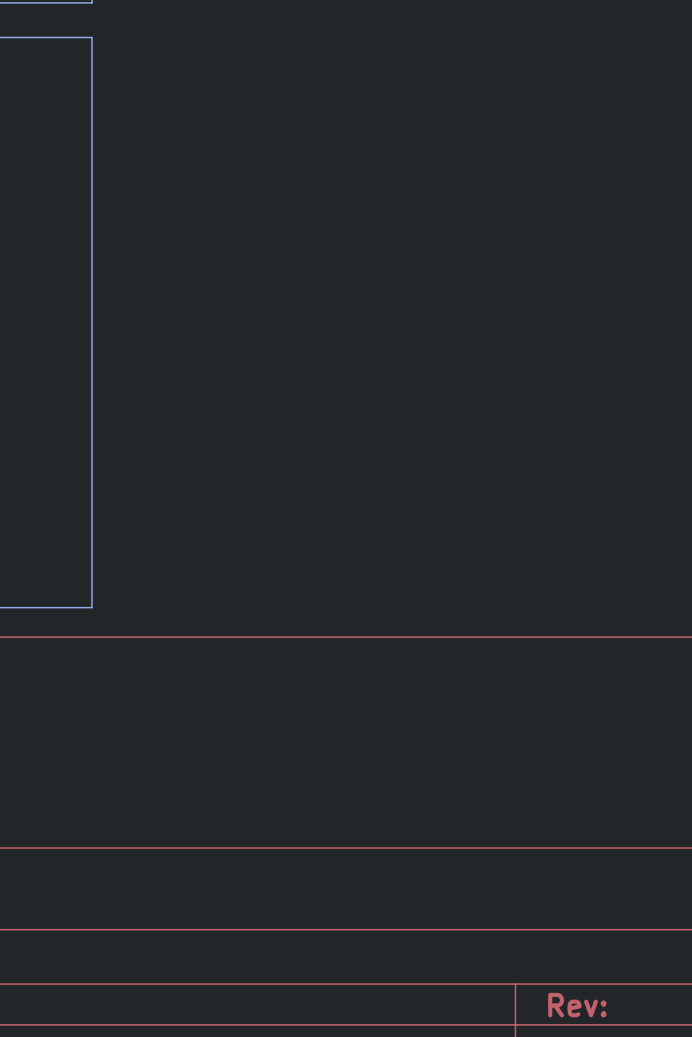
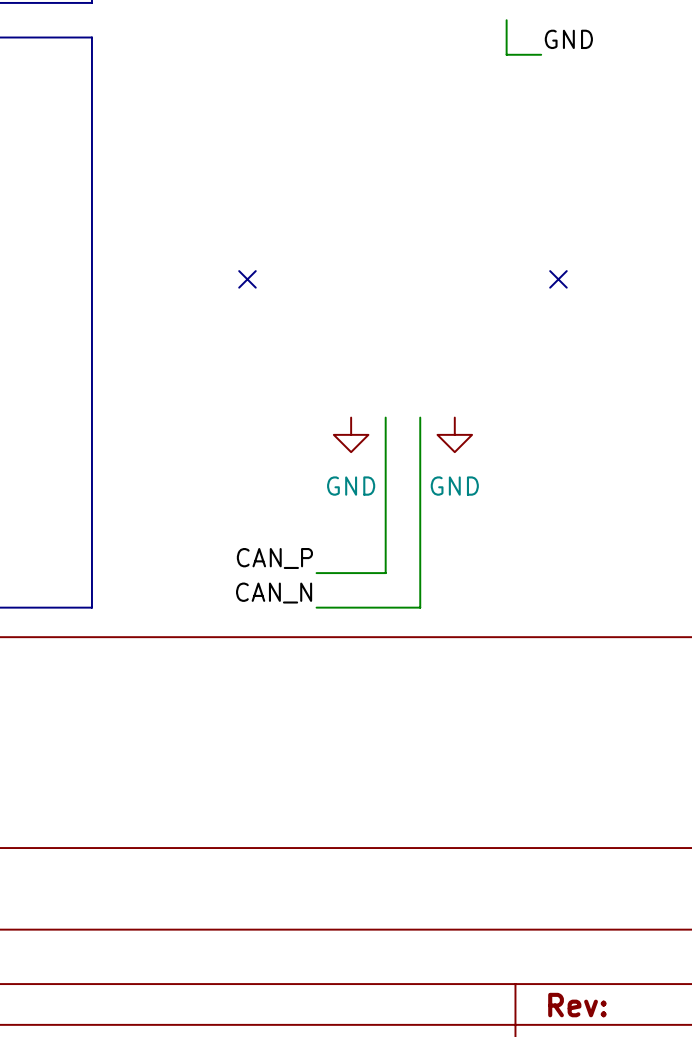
wire: none -> (506, 20) (506, 54) (541, 54)
label: none -> GND (568, 39)
no-connect mark: none -> (247, 279)
no-connect mark: none -> (558, 279)
wire: none -> (385, 417) (385, 573) (316, 573)
wire: none -> (420, 417) (420, 607) (316, 607)
power symbol: none -> GND (351, 434)
power symbol: none -> GND (454, 434)
label: none -> CAN_P (274, 558)
label: none -> CAN_N (274, 593)

